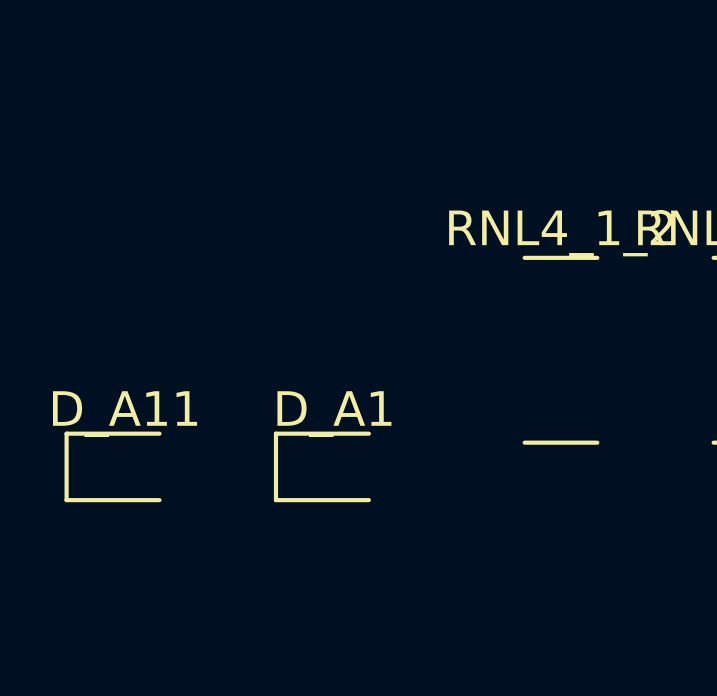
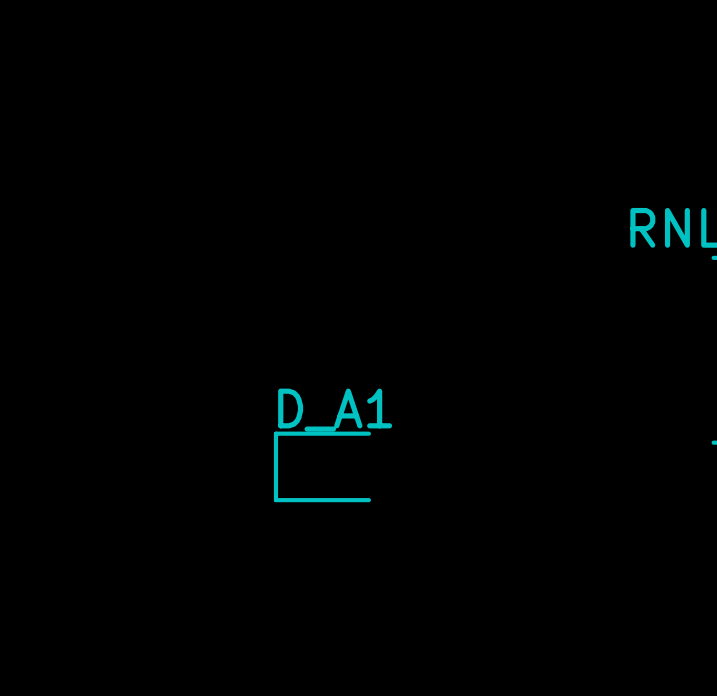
RNL4_1_2: (560, 350) -> none
D_A11: (113, 466) -> none

